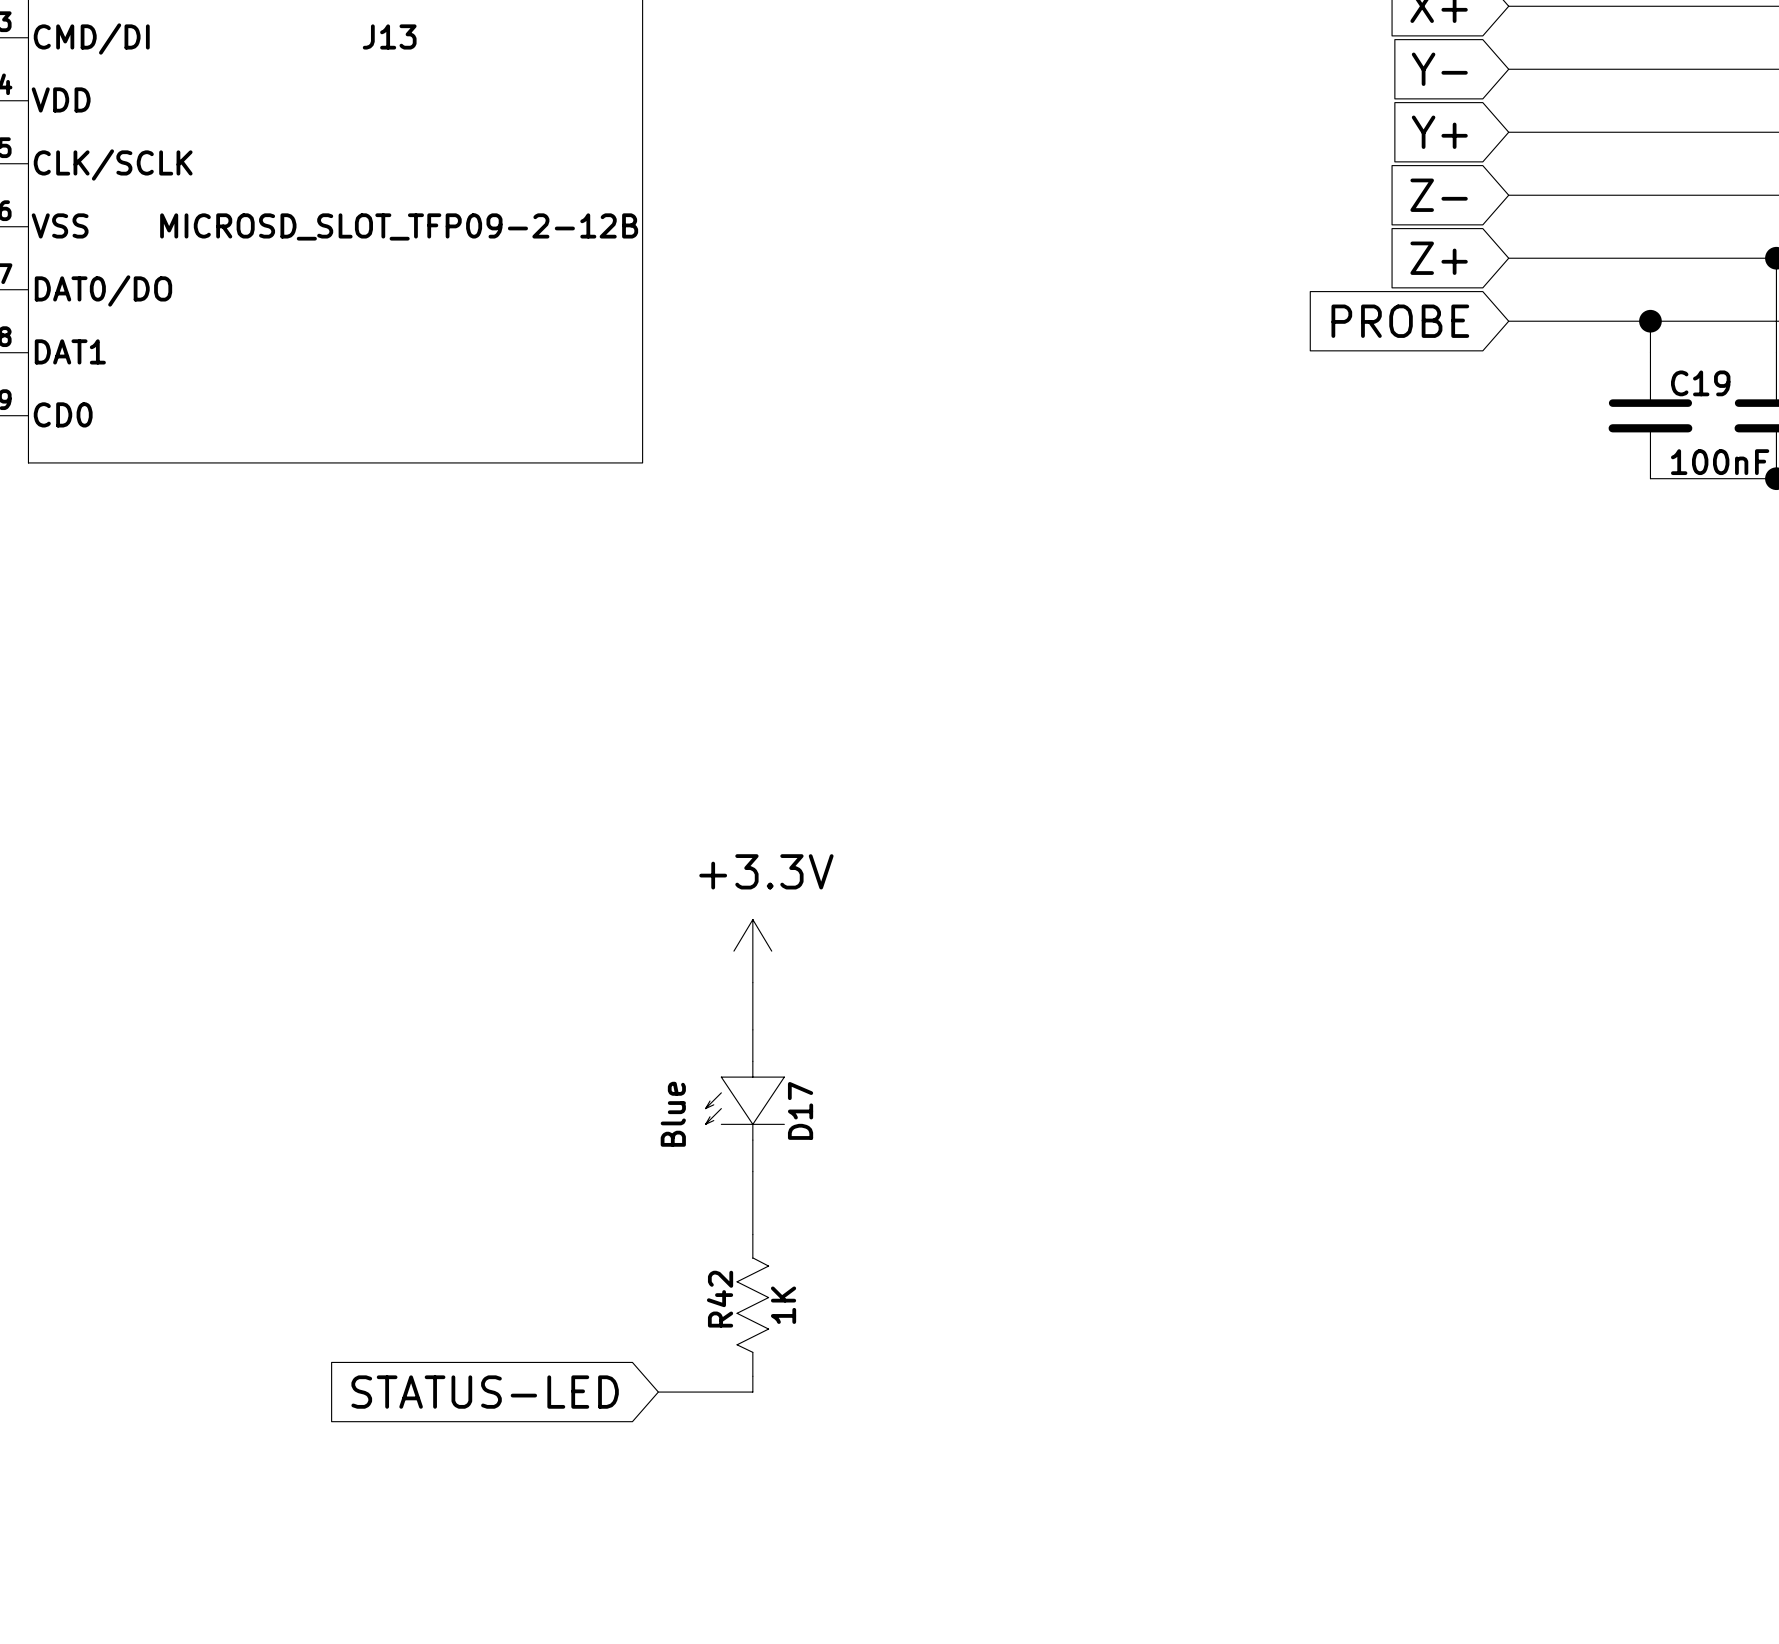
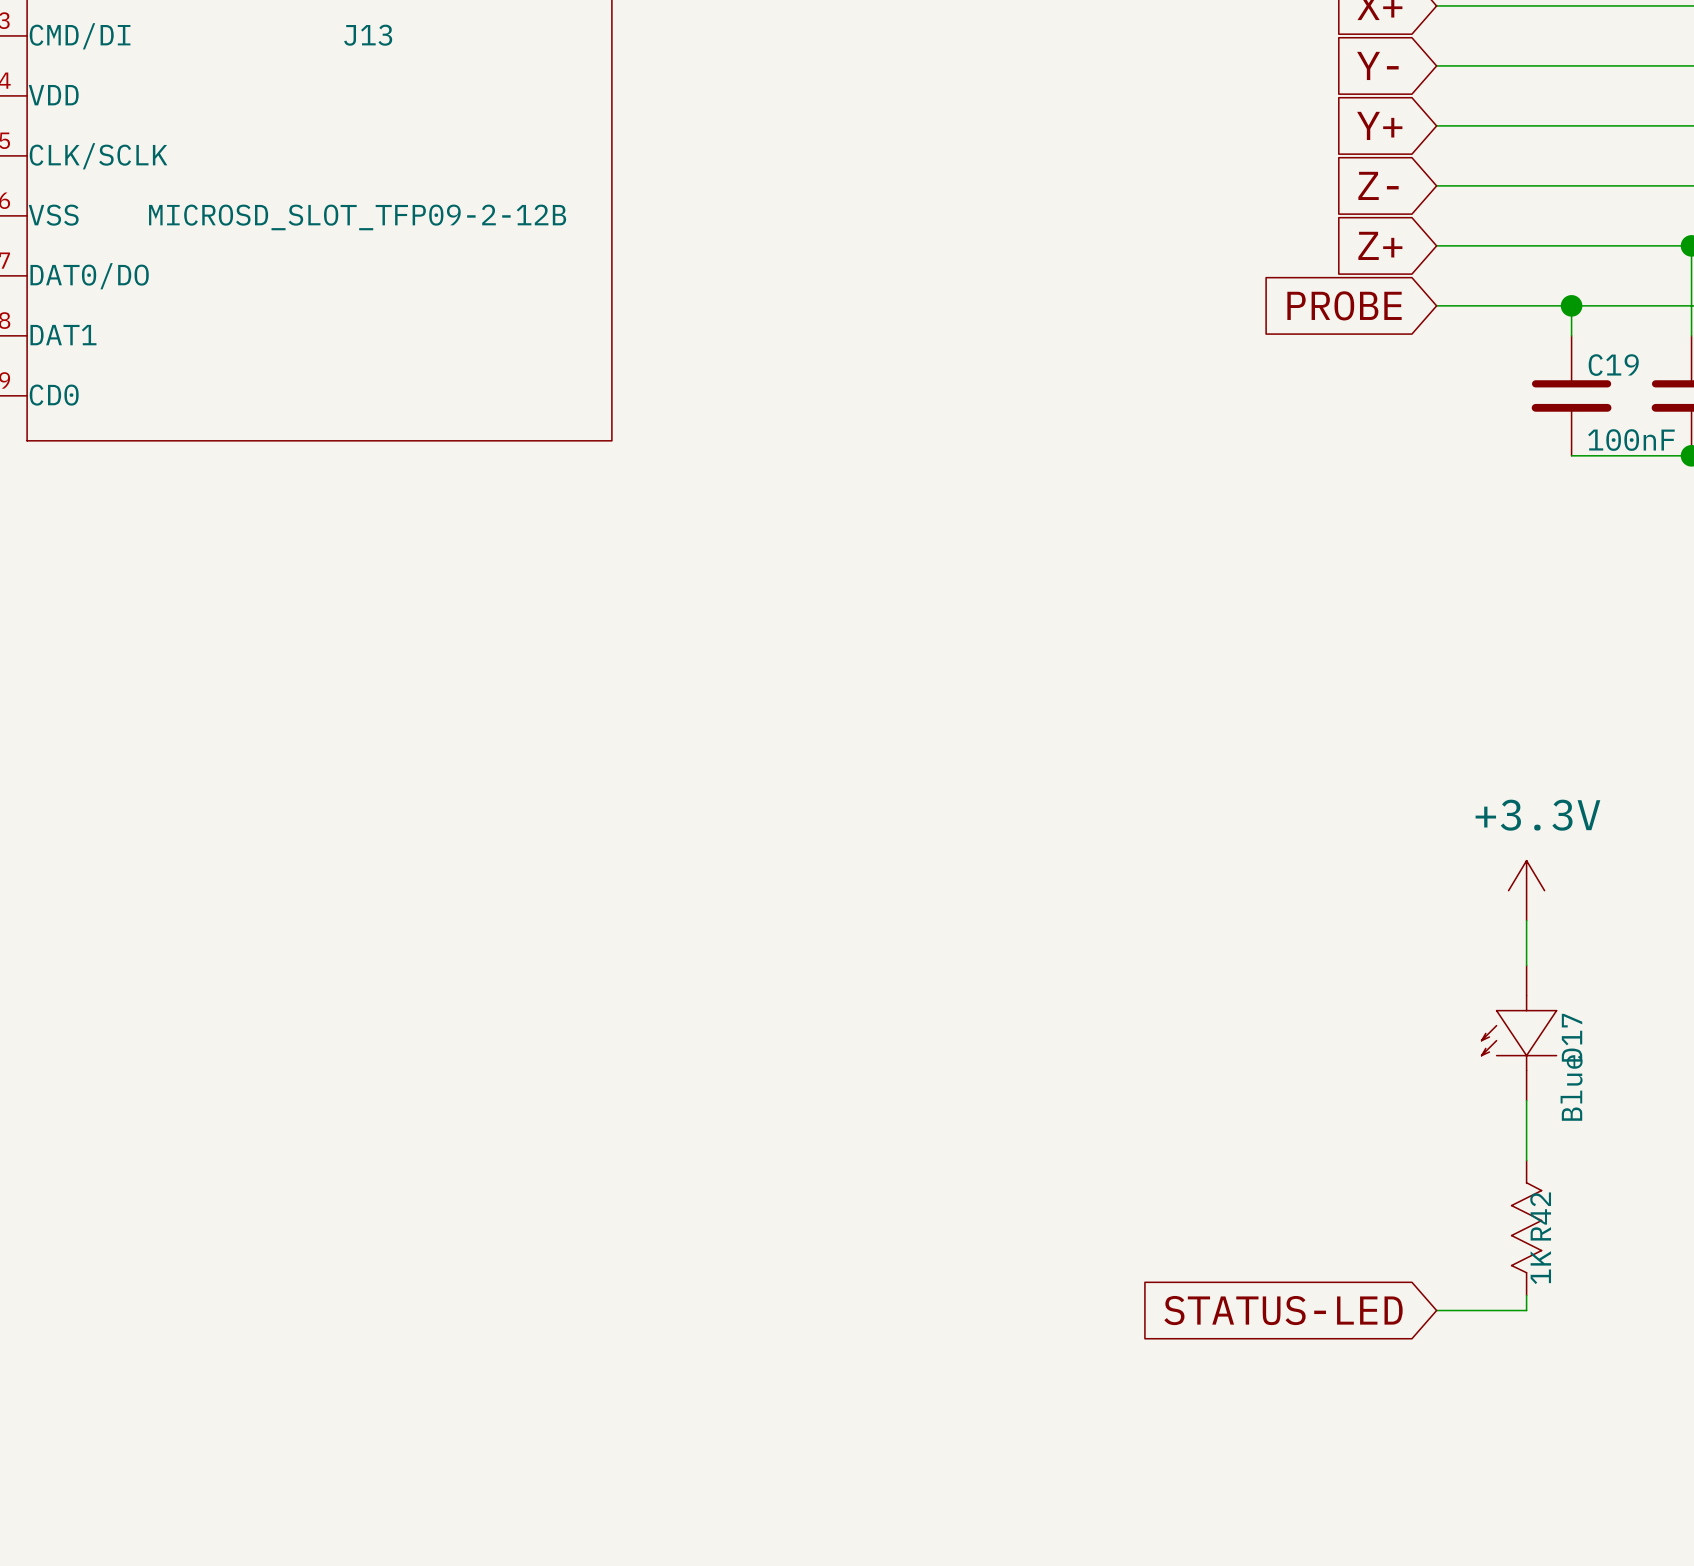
power symbol: none -> +3.3V (1526, 890)
power symbol: +3.3V (752, 951) -> none
wire: none -> (1526, 920) (1526, 965)
wire: (752, 982) (752, 1029) -> none
D17 position: (744, 1100) -> (1519, 1033)
D17 value position: Blue (673, 1114) -> Blue (1571, 1087)
wire: none -> (1526, 1100) (1526, 1160)
wire: (752, 1171) (752, 1234) -> none
R42 name position: R42 (720, 1299) -> R42 (1540, 1216)
R42 position: (752, 1305) -> (1526, 1228)
R42 value position: 1K (783, 1305) -> 1K (1540, 1267)
wire: none -> (1526, 1295) (1526, 1310) (1436, 1310)
wire: (752, 1376) (752, 1392) (658, 1392) -> none
global label: none -> STATUS-LED (1283, 1310)
global label: STATUS-LED (485, 1392) -> none

